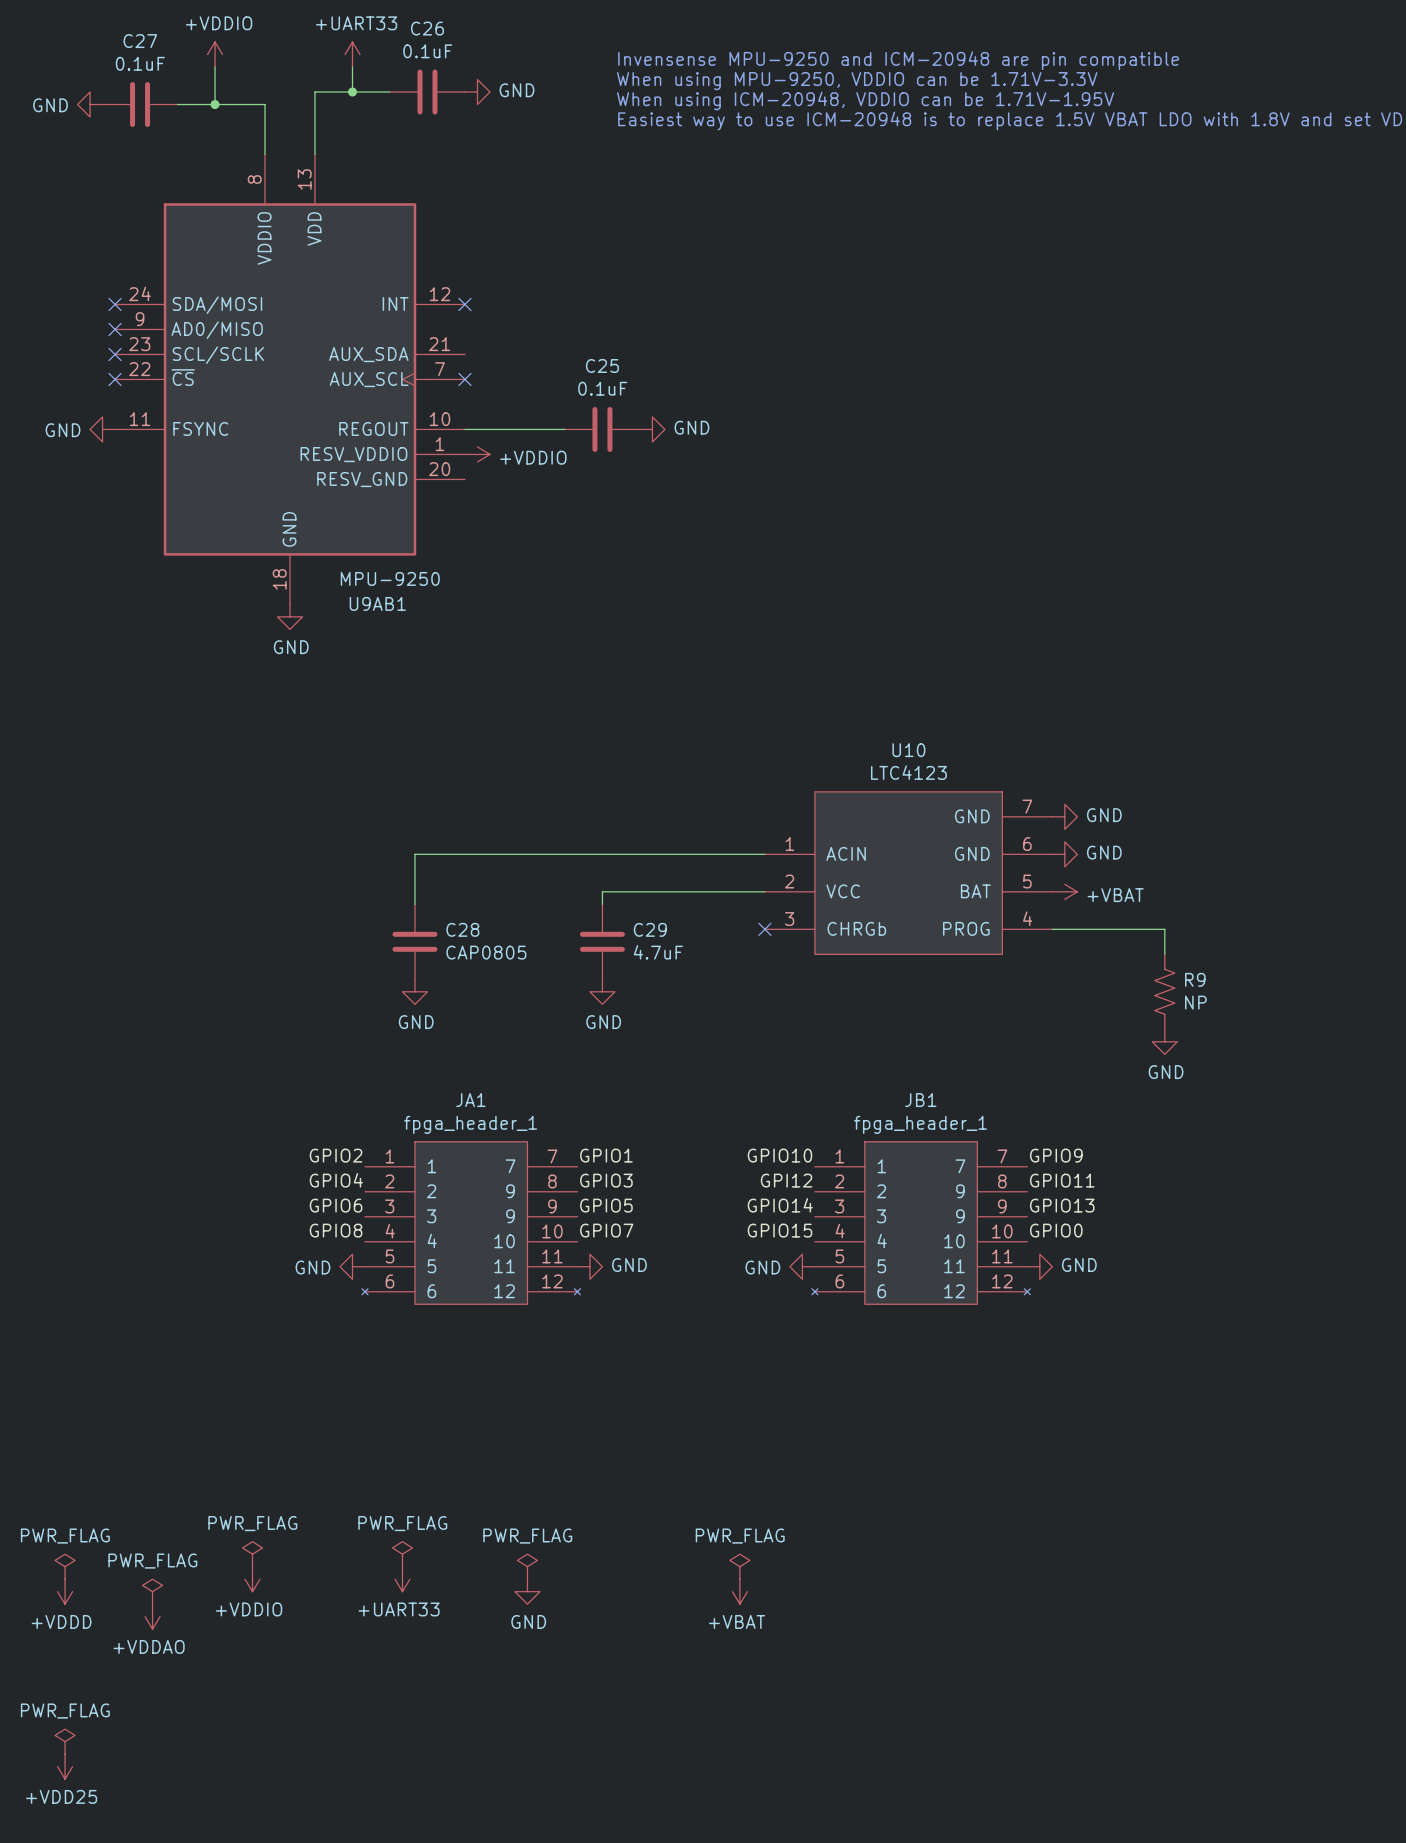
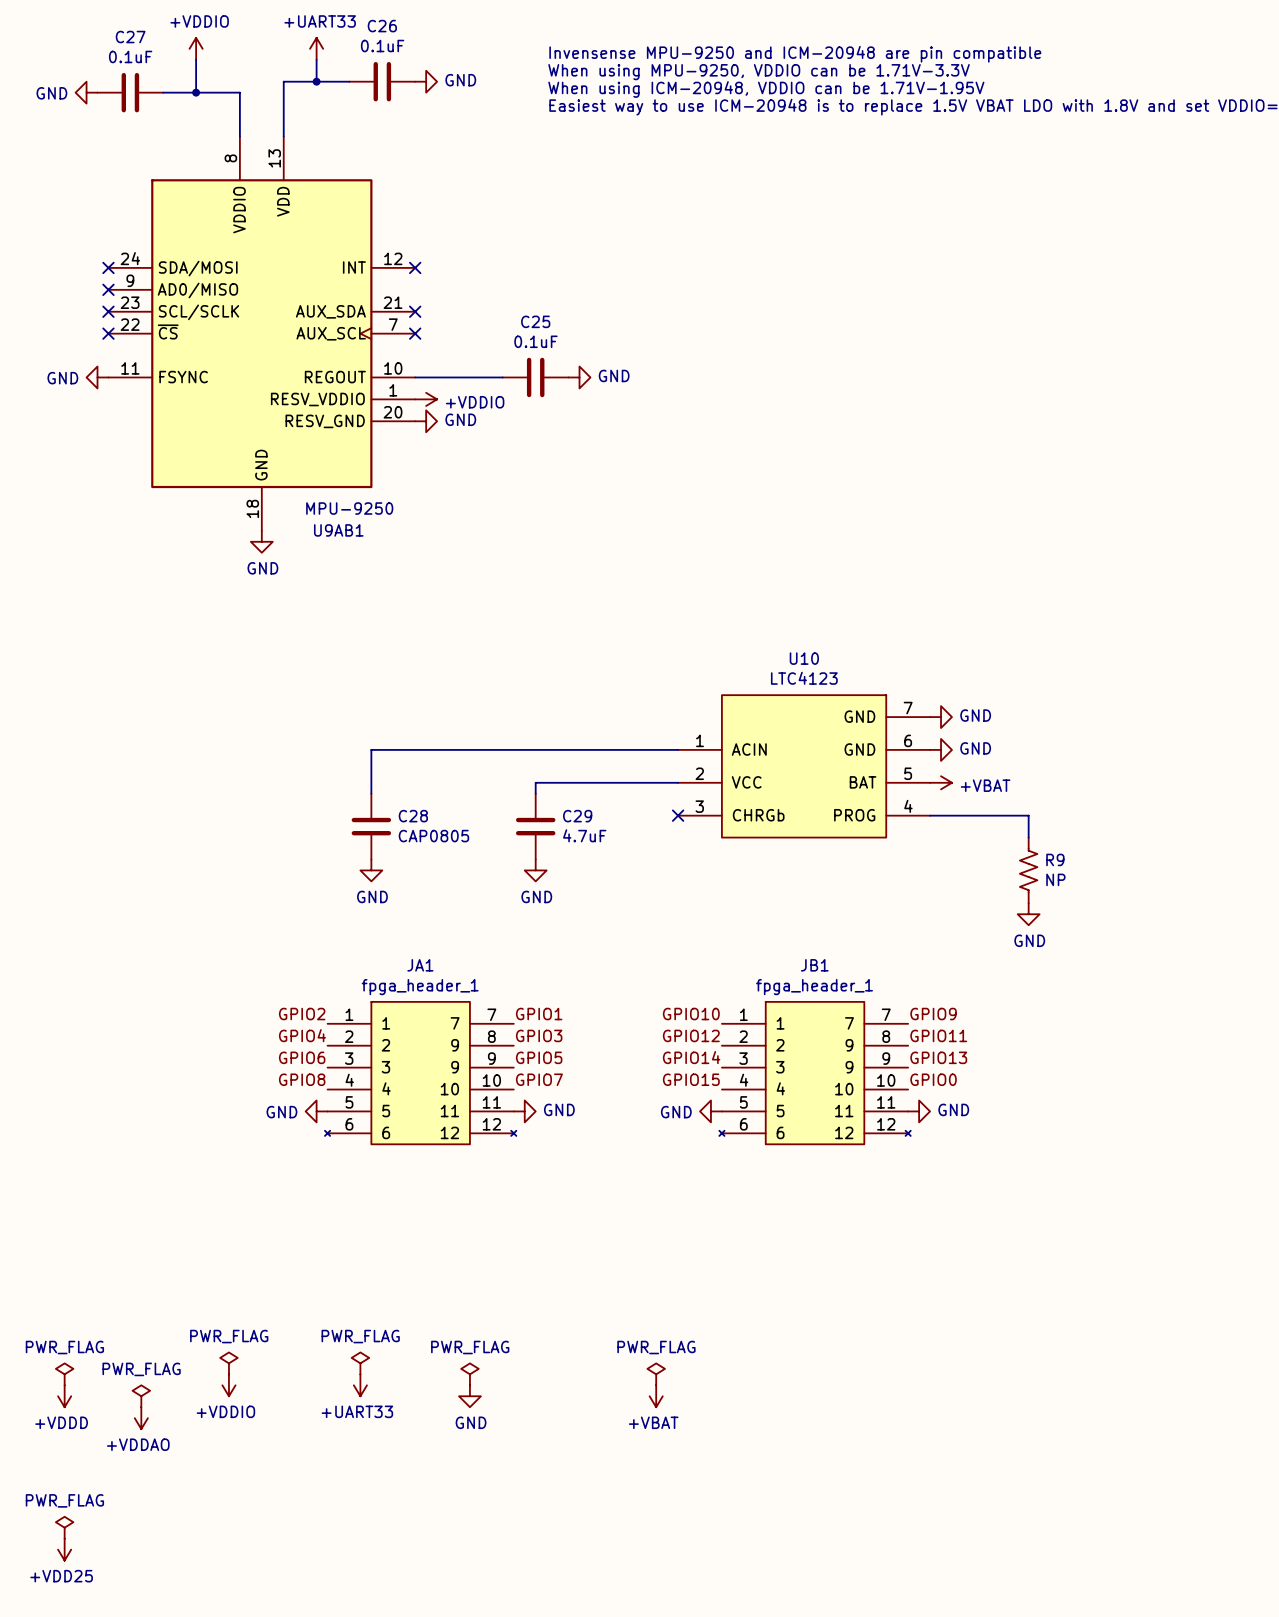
no-connect mark: none -> (415, 311)
power symbol: none -> GND (426, 421)
label: GPI12 (786, 1180) -> GPIO12 (691, 1035)

